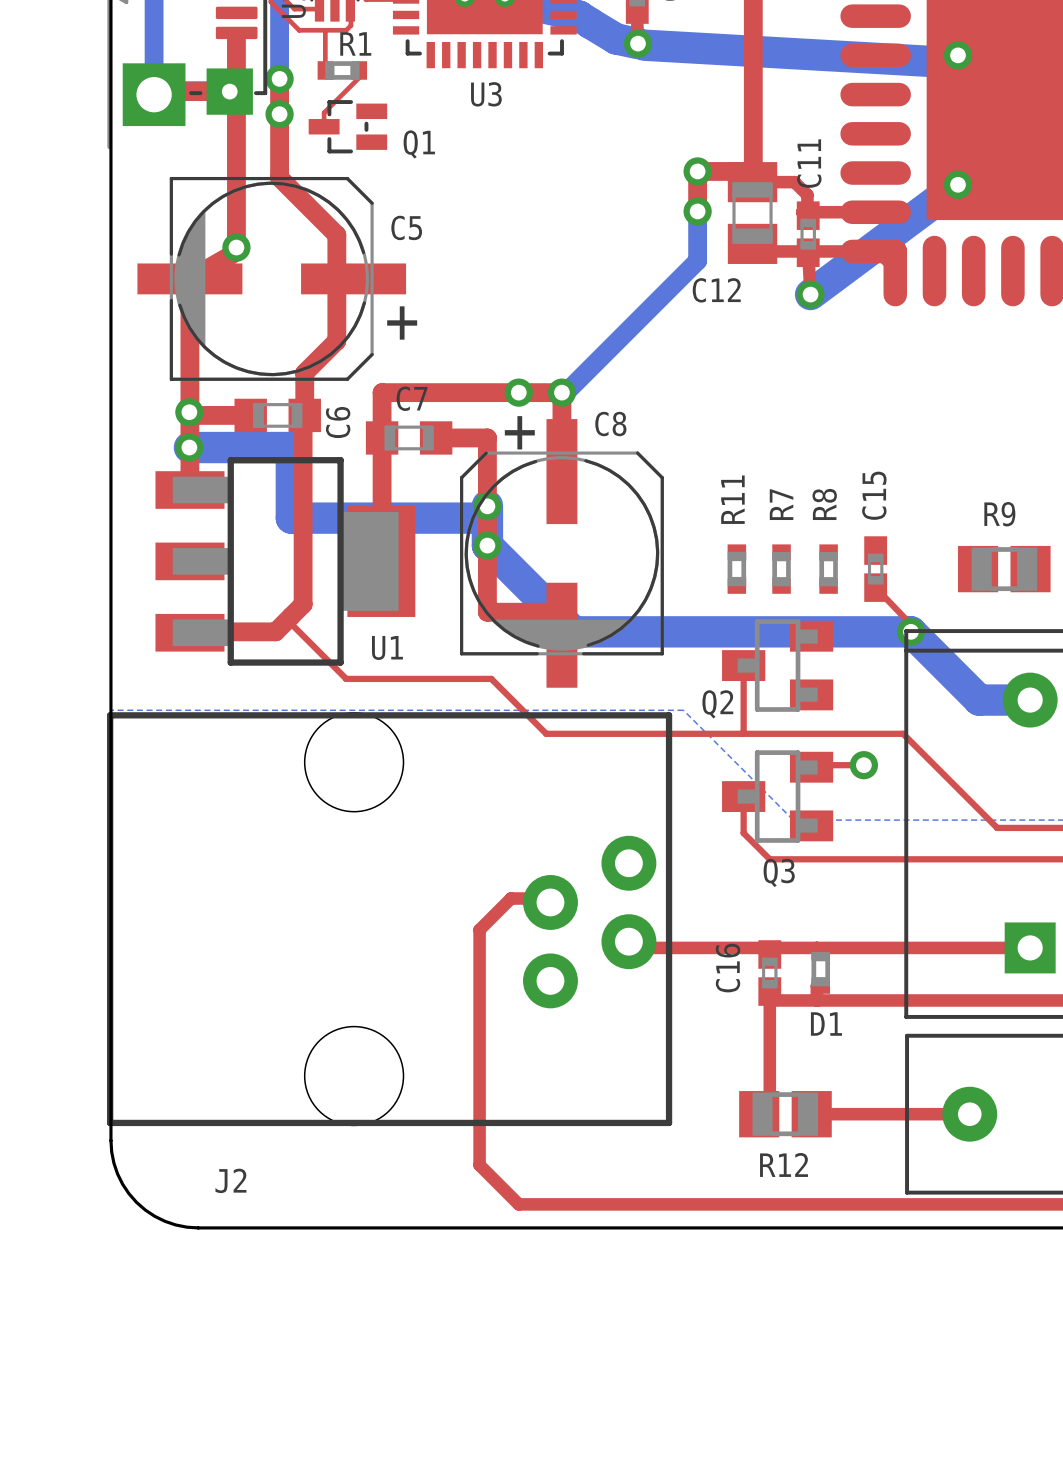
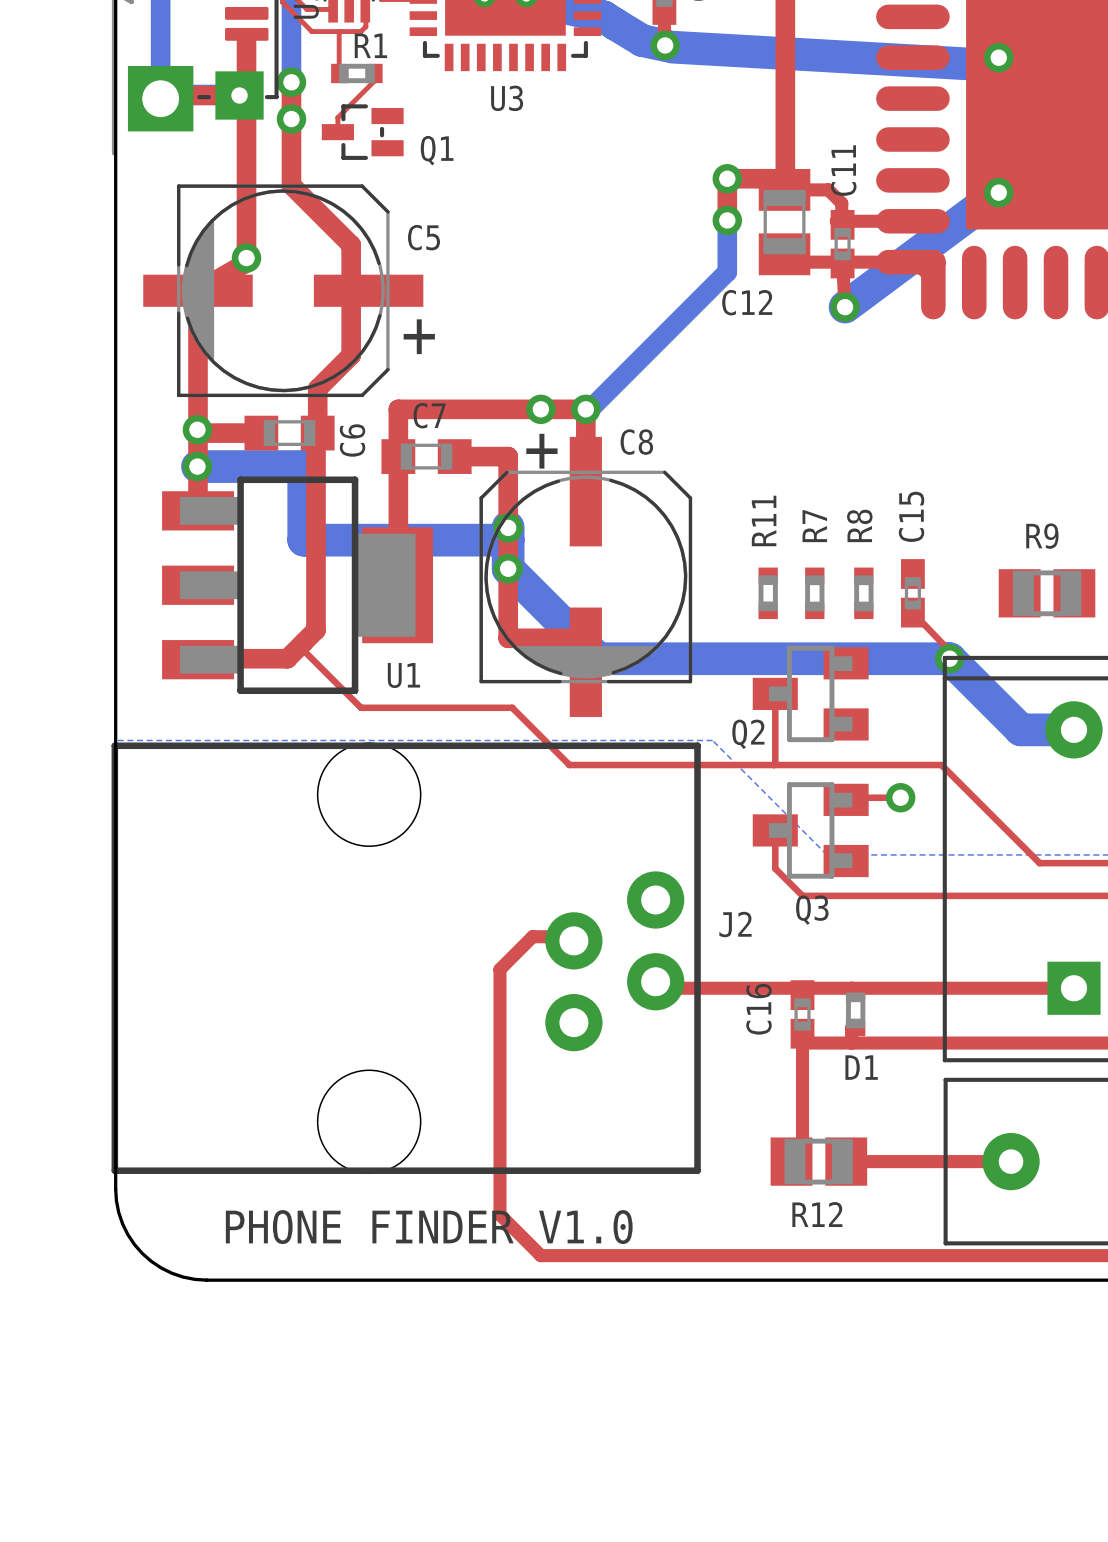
text: none -> PHONE FINDER V1.0 (429, 1227)
J2 name position: J2 (230, 1180) -> J2 (735, 924)

